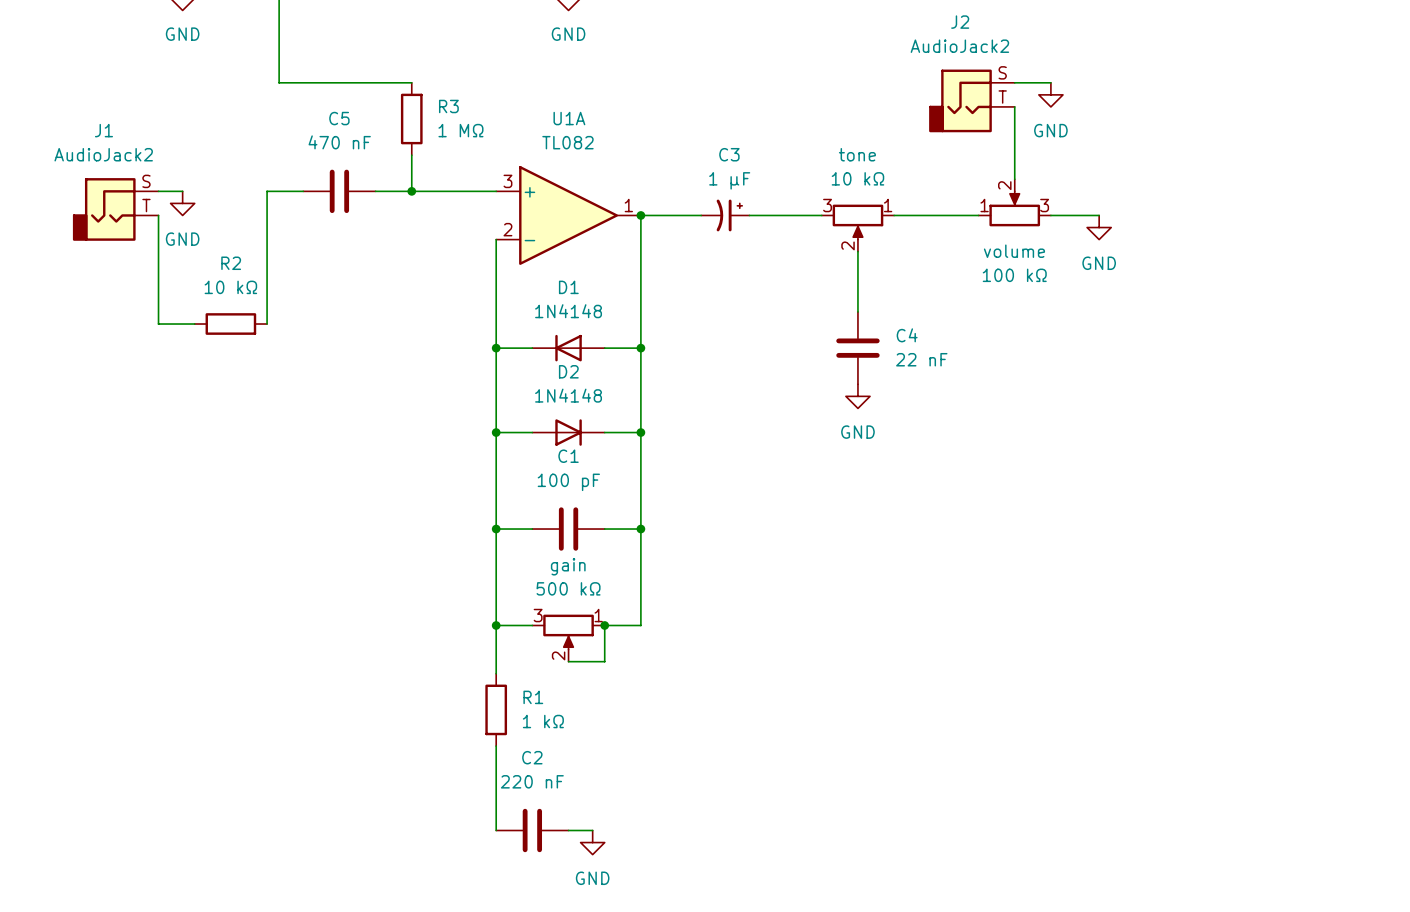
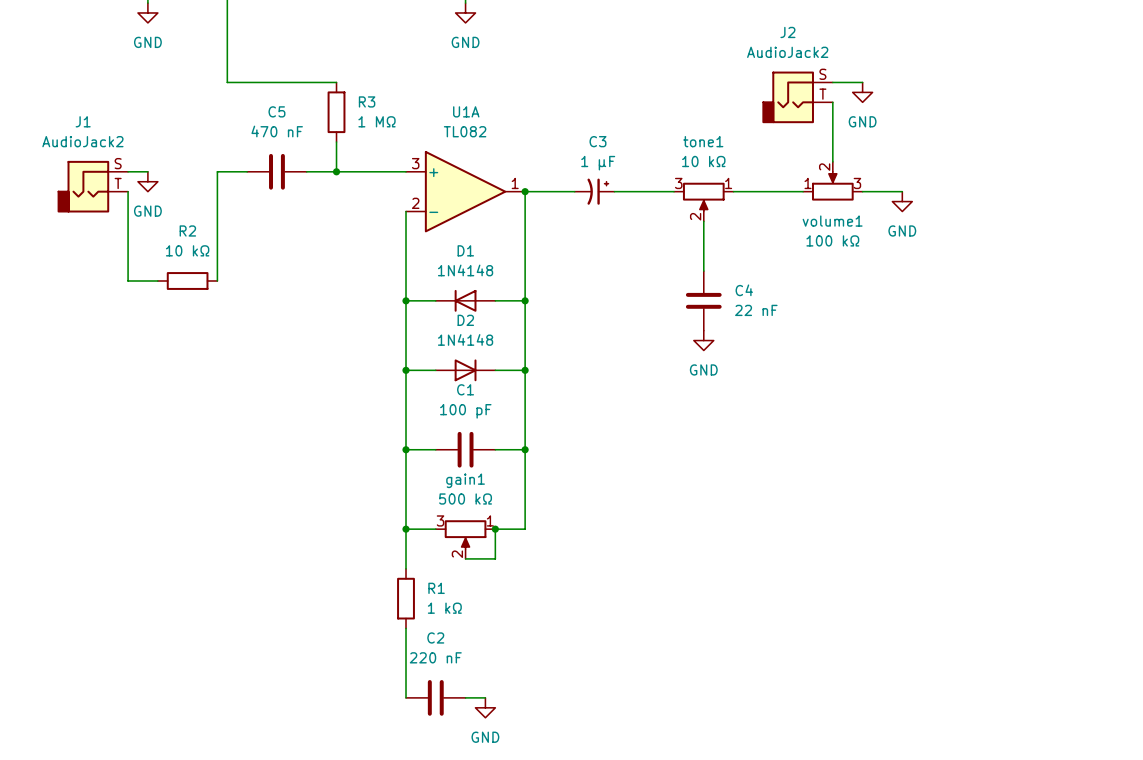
tone name: tone (857, 154) -> tone1 (703, 141)
volume name: volume (1014, 251) -> volume1 (832, 221)
gain name: gain (568, 566) -> gain1 (465, 480)

